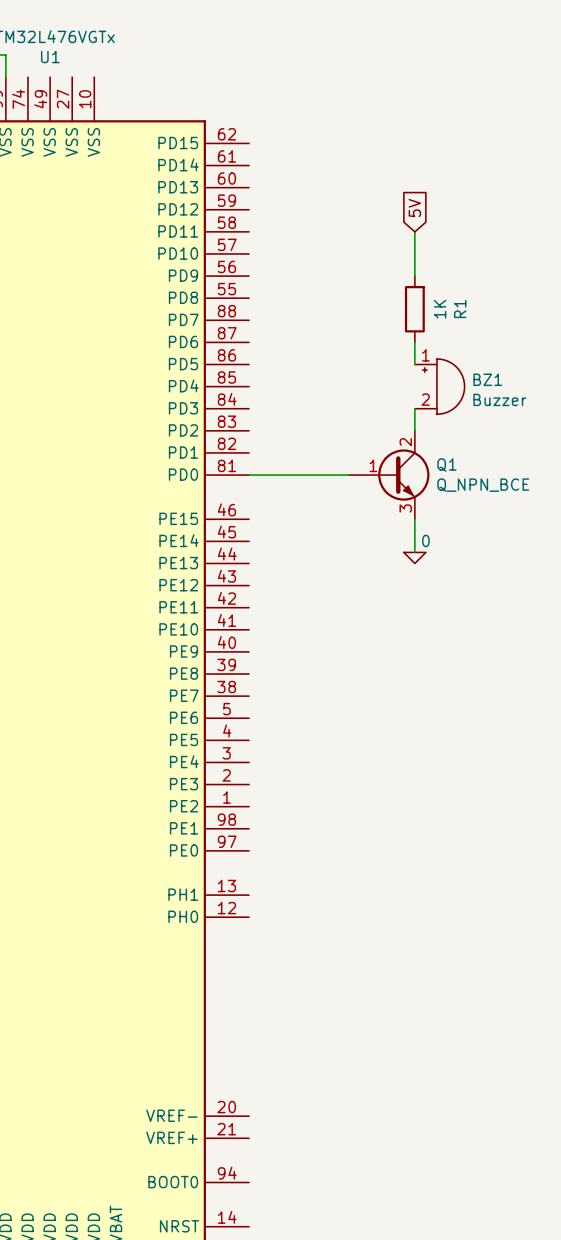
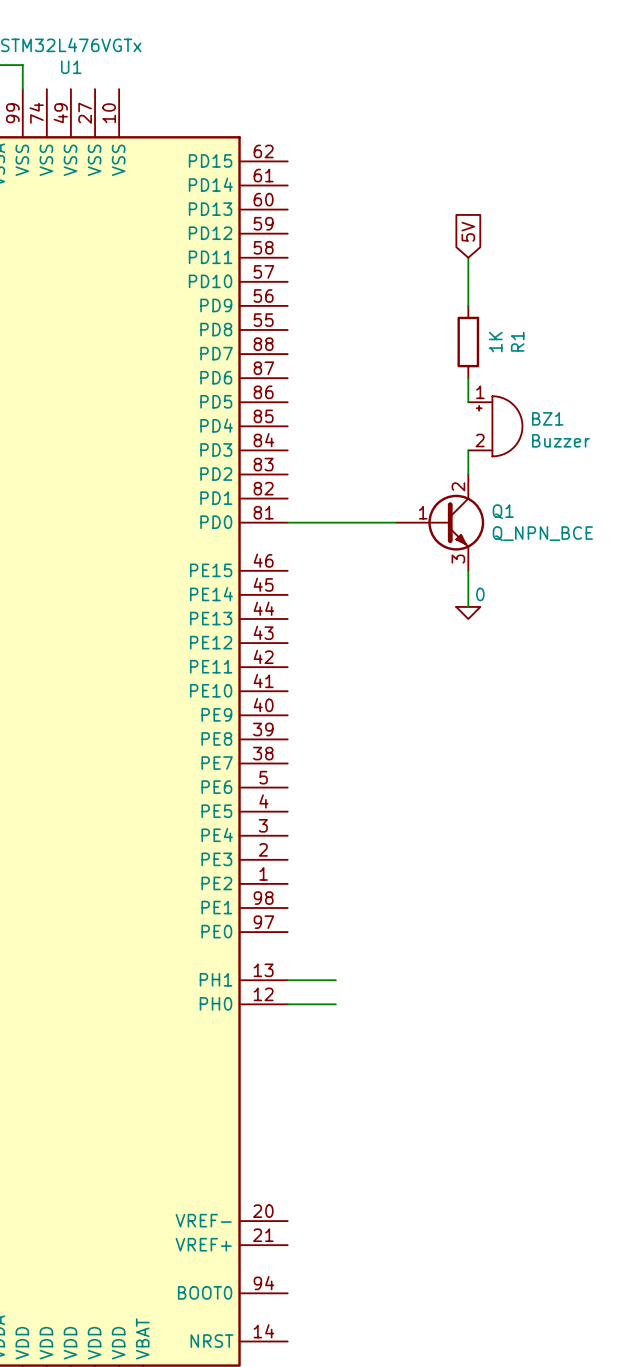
wire: none -> (287, 980) (335, 980)
wire: none -> (287, 1004) (335, 1004)

